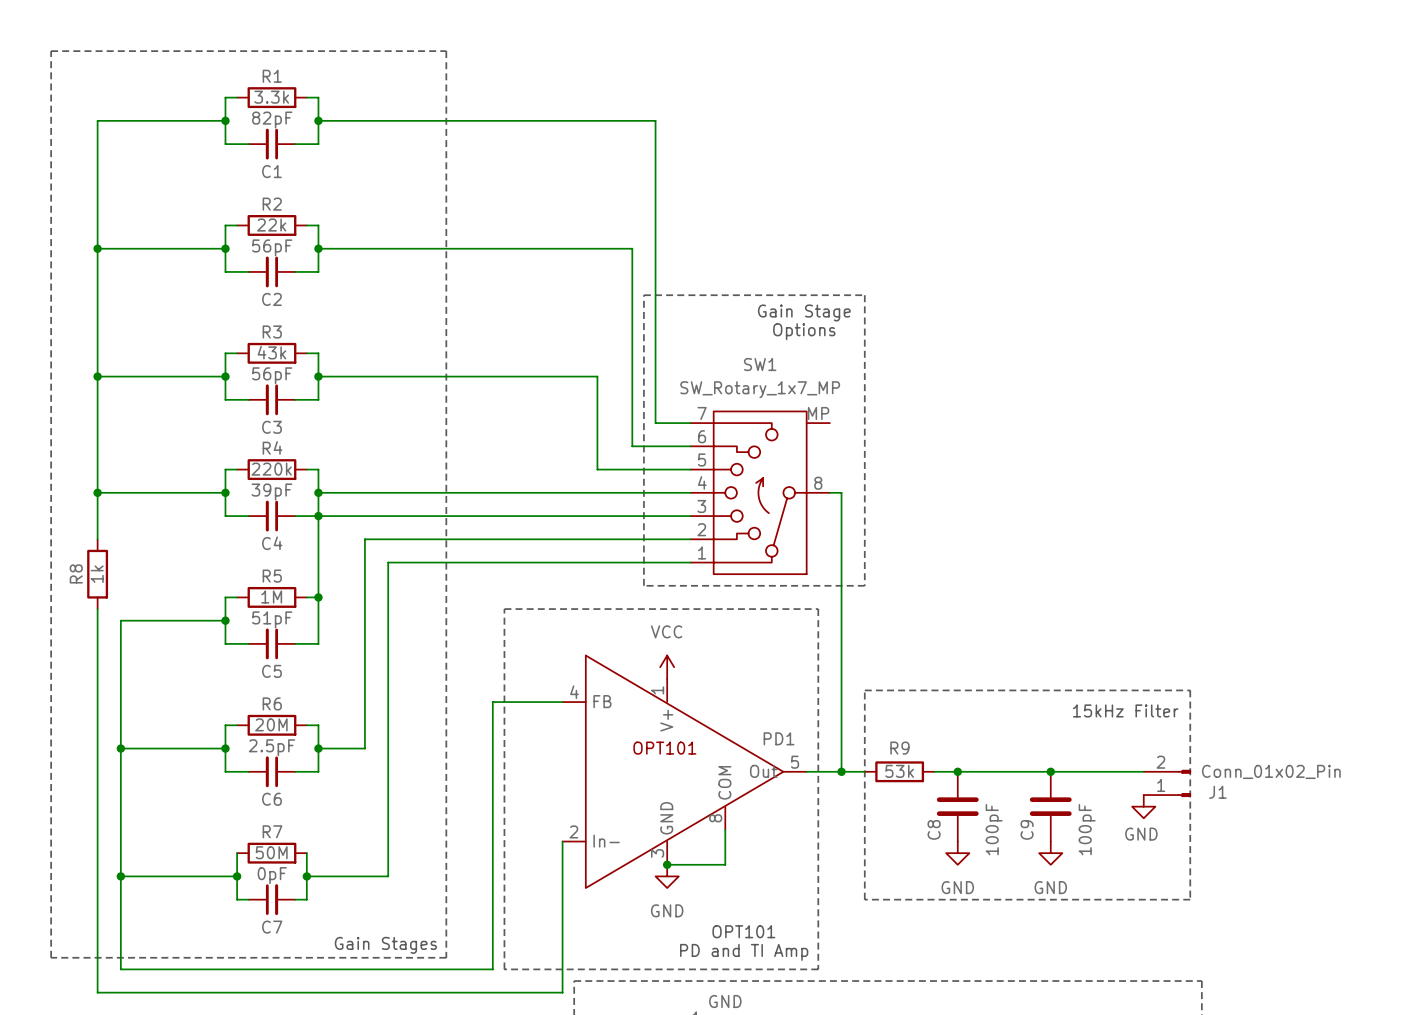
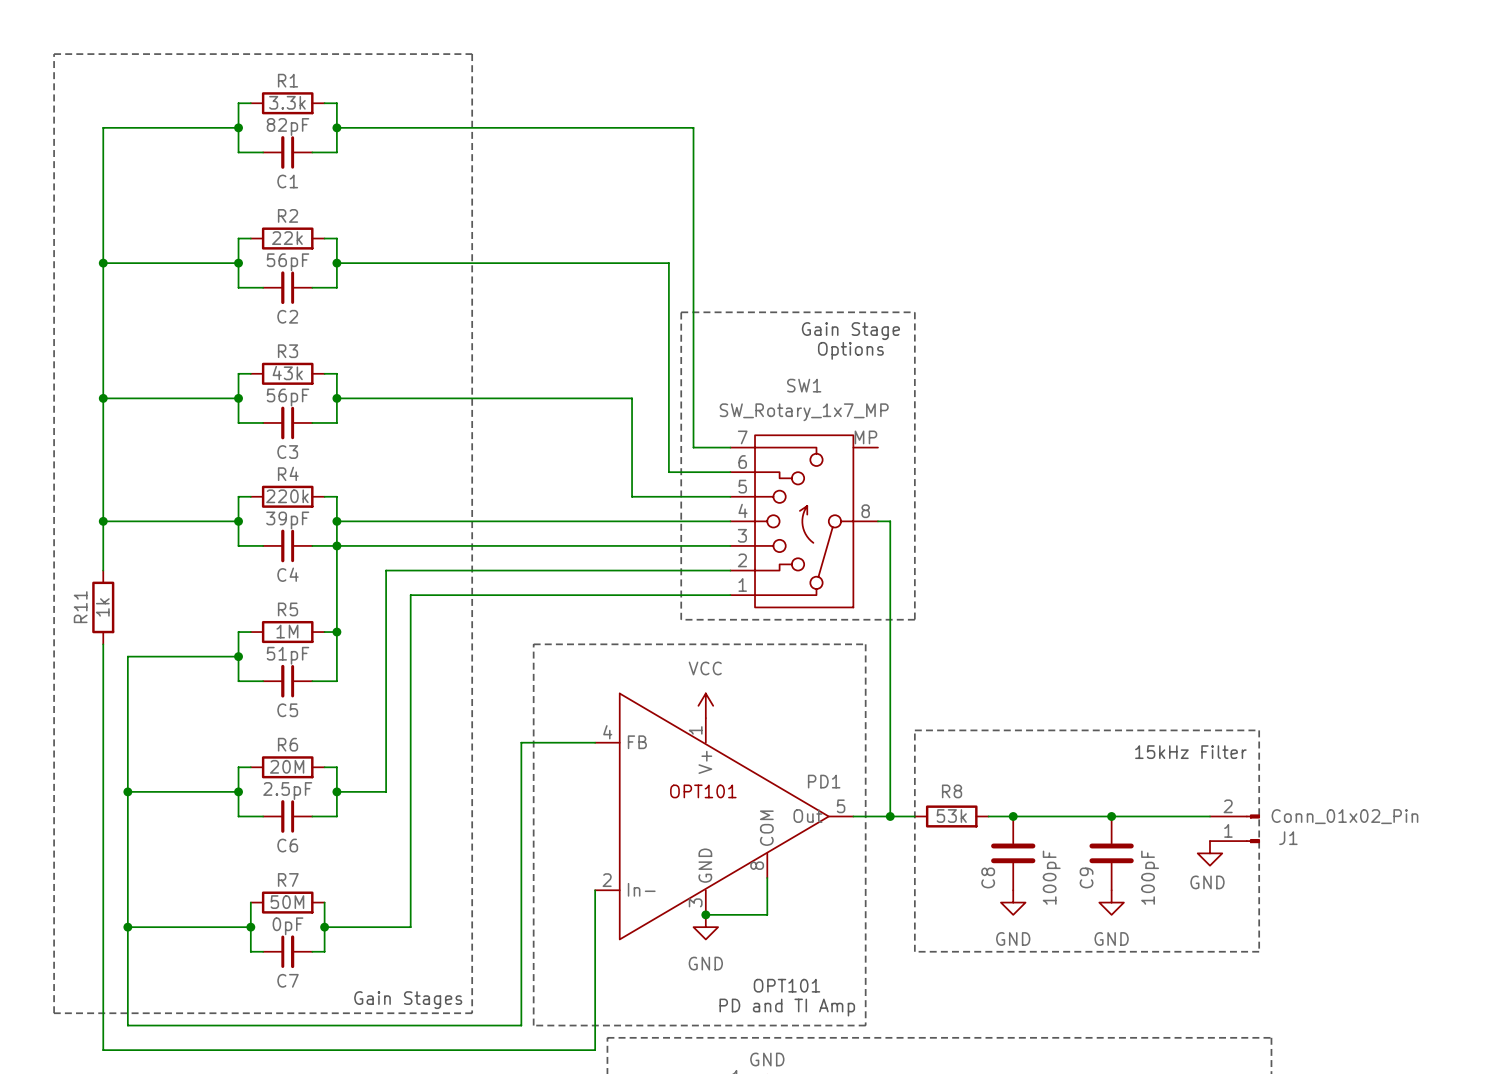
R8 name: R8 (76, 573) -> R11 (80, 607)
R9 name: R9 (899, 748) -> R8 (952, 791)

